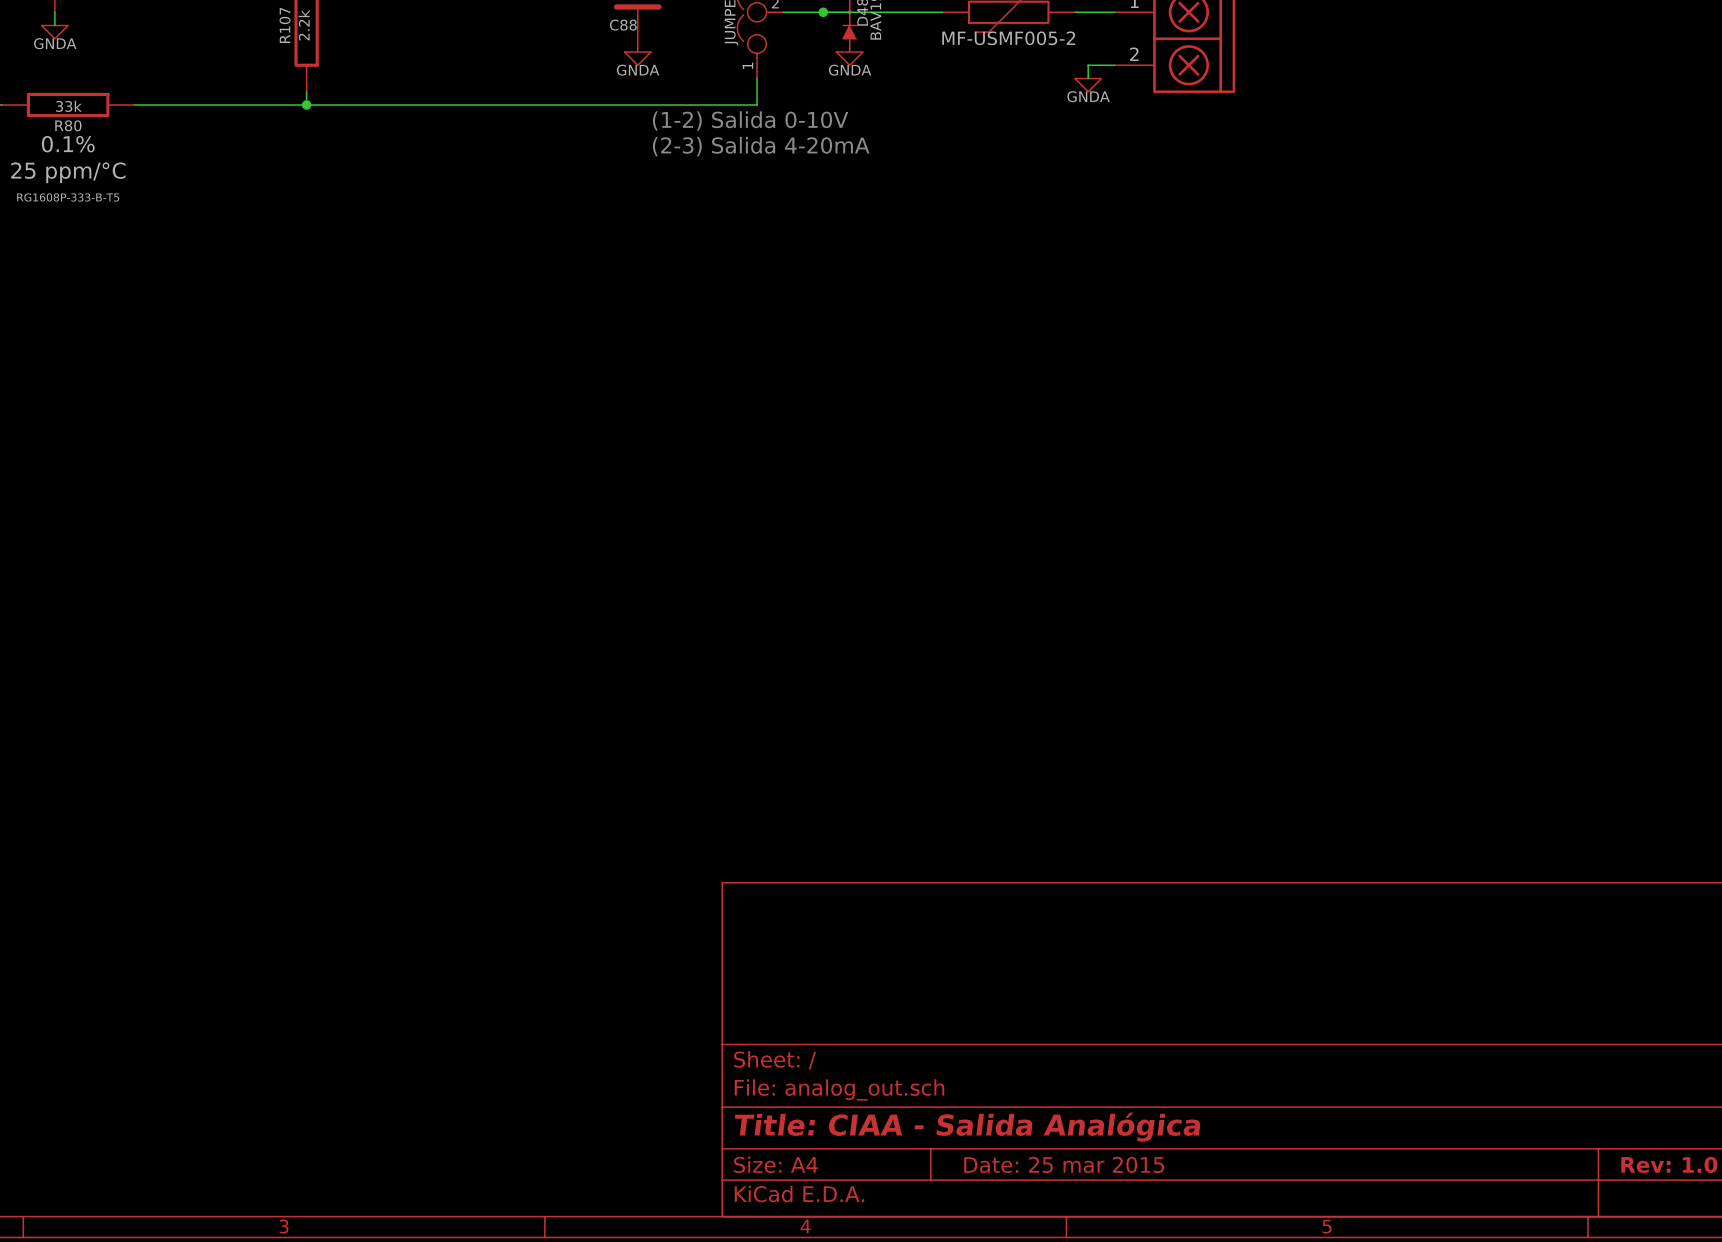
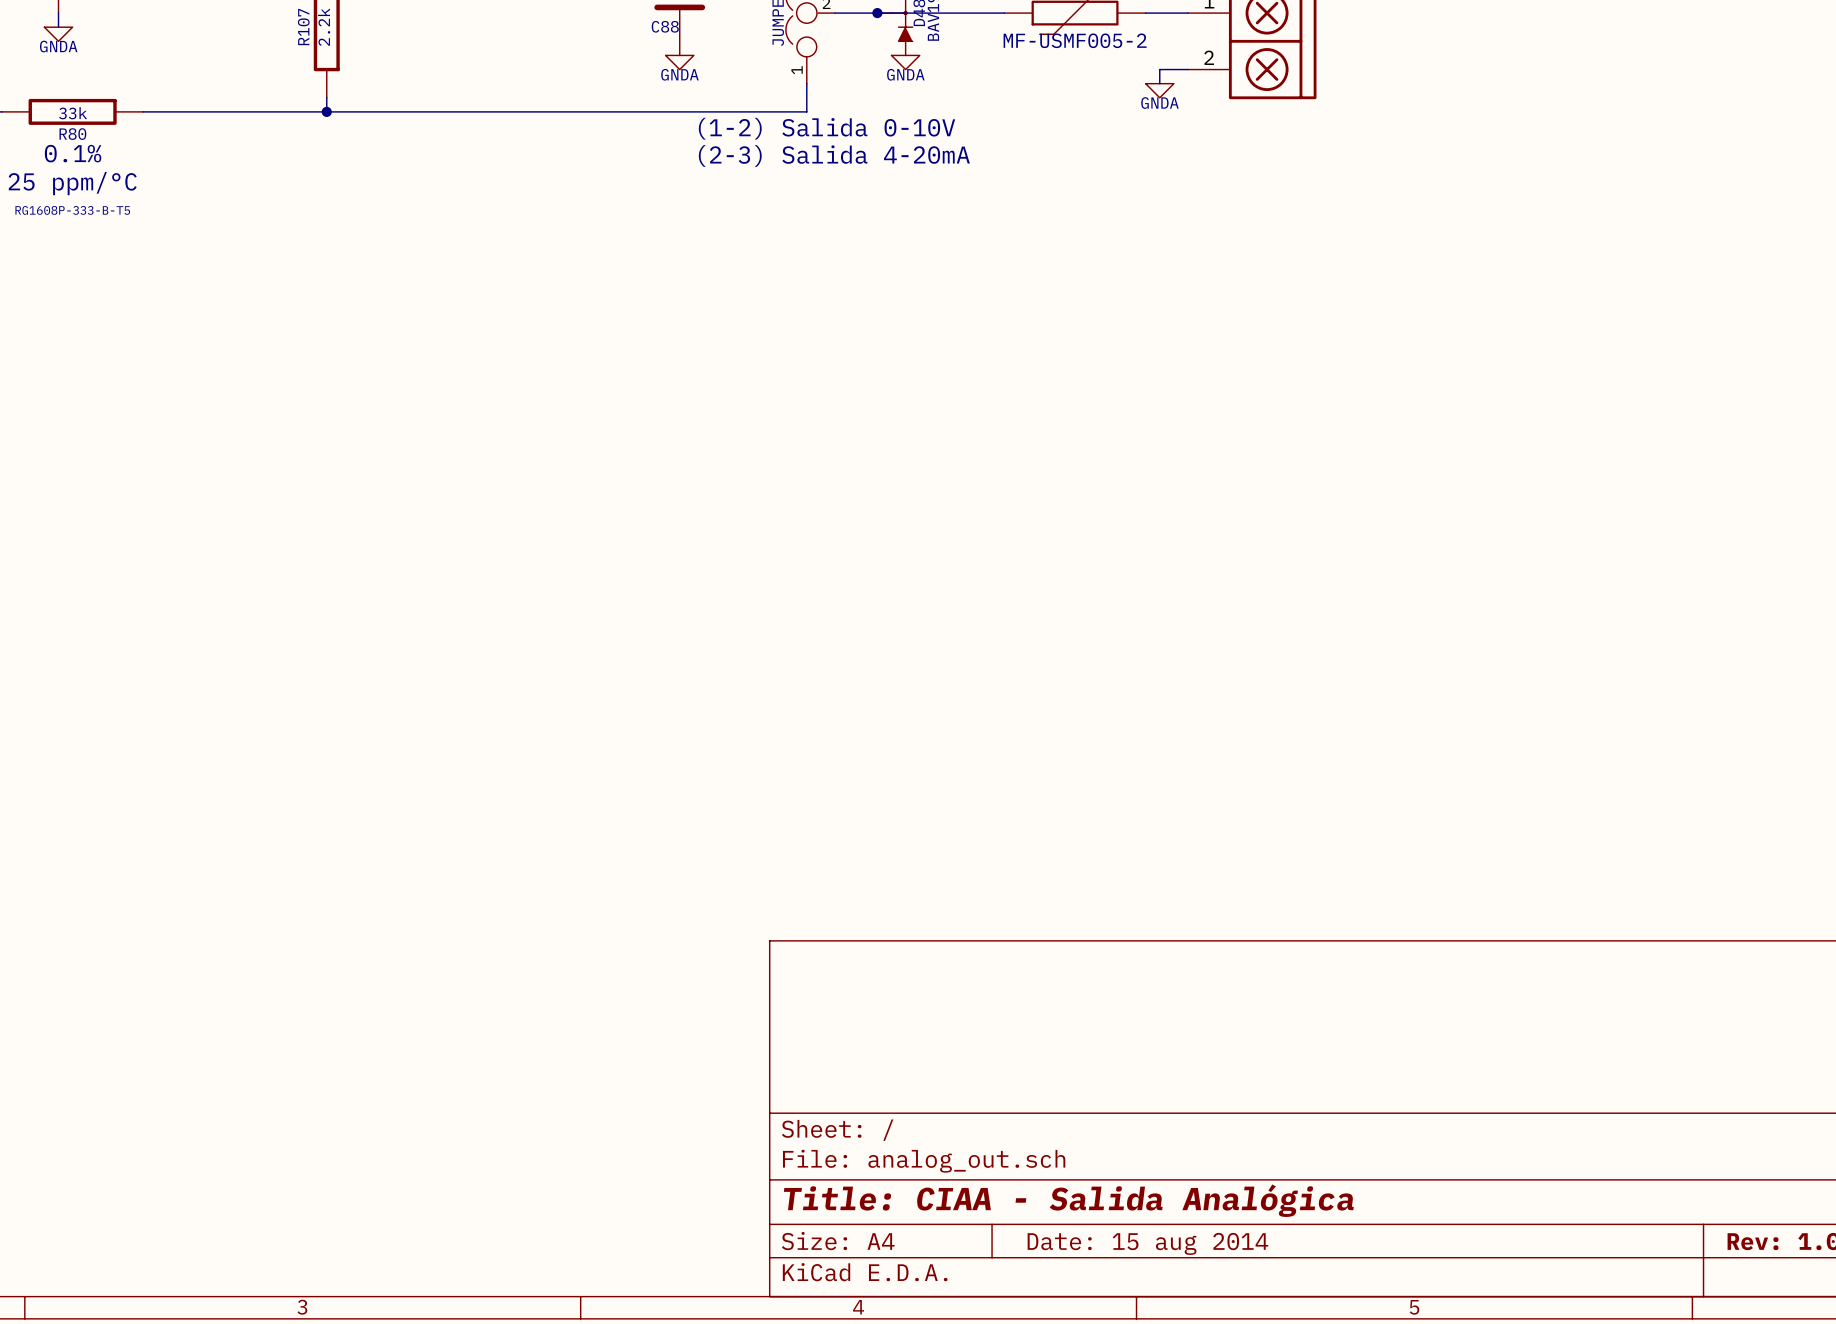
title block: Date: 25 mar 2015 (1064, 1164) -> Date: 15 aug 2014 (1147, 1243)

